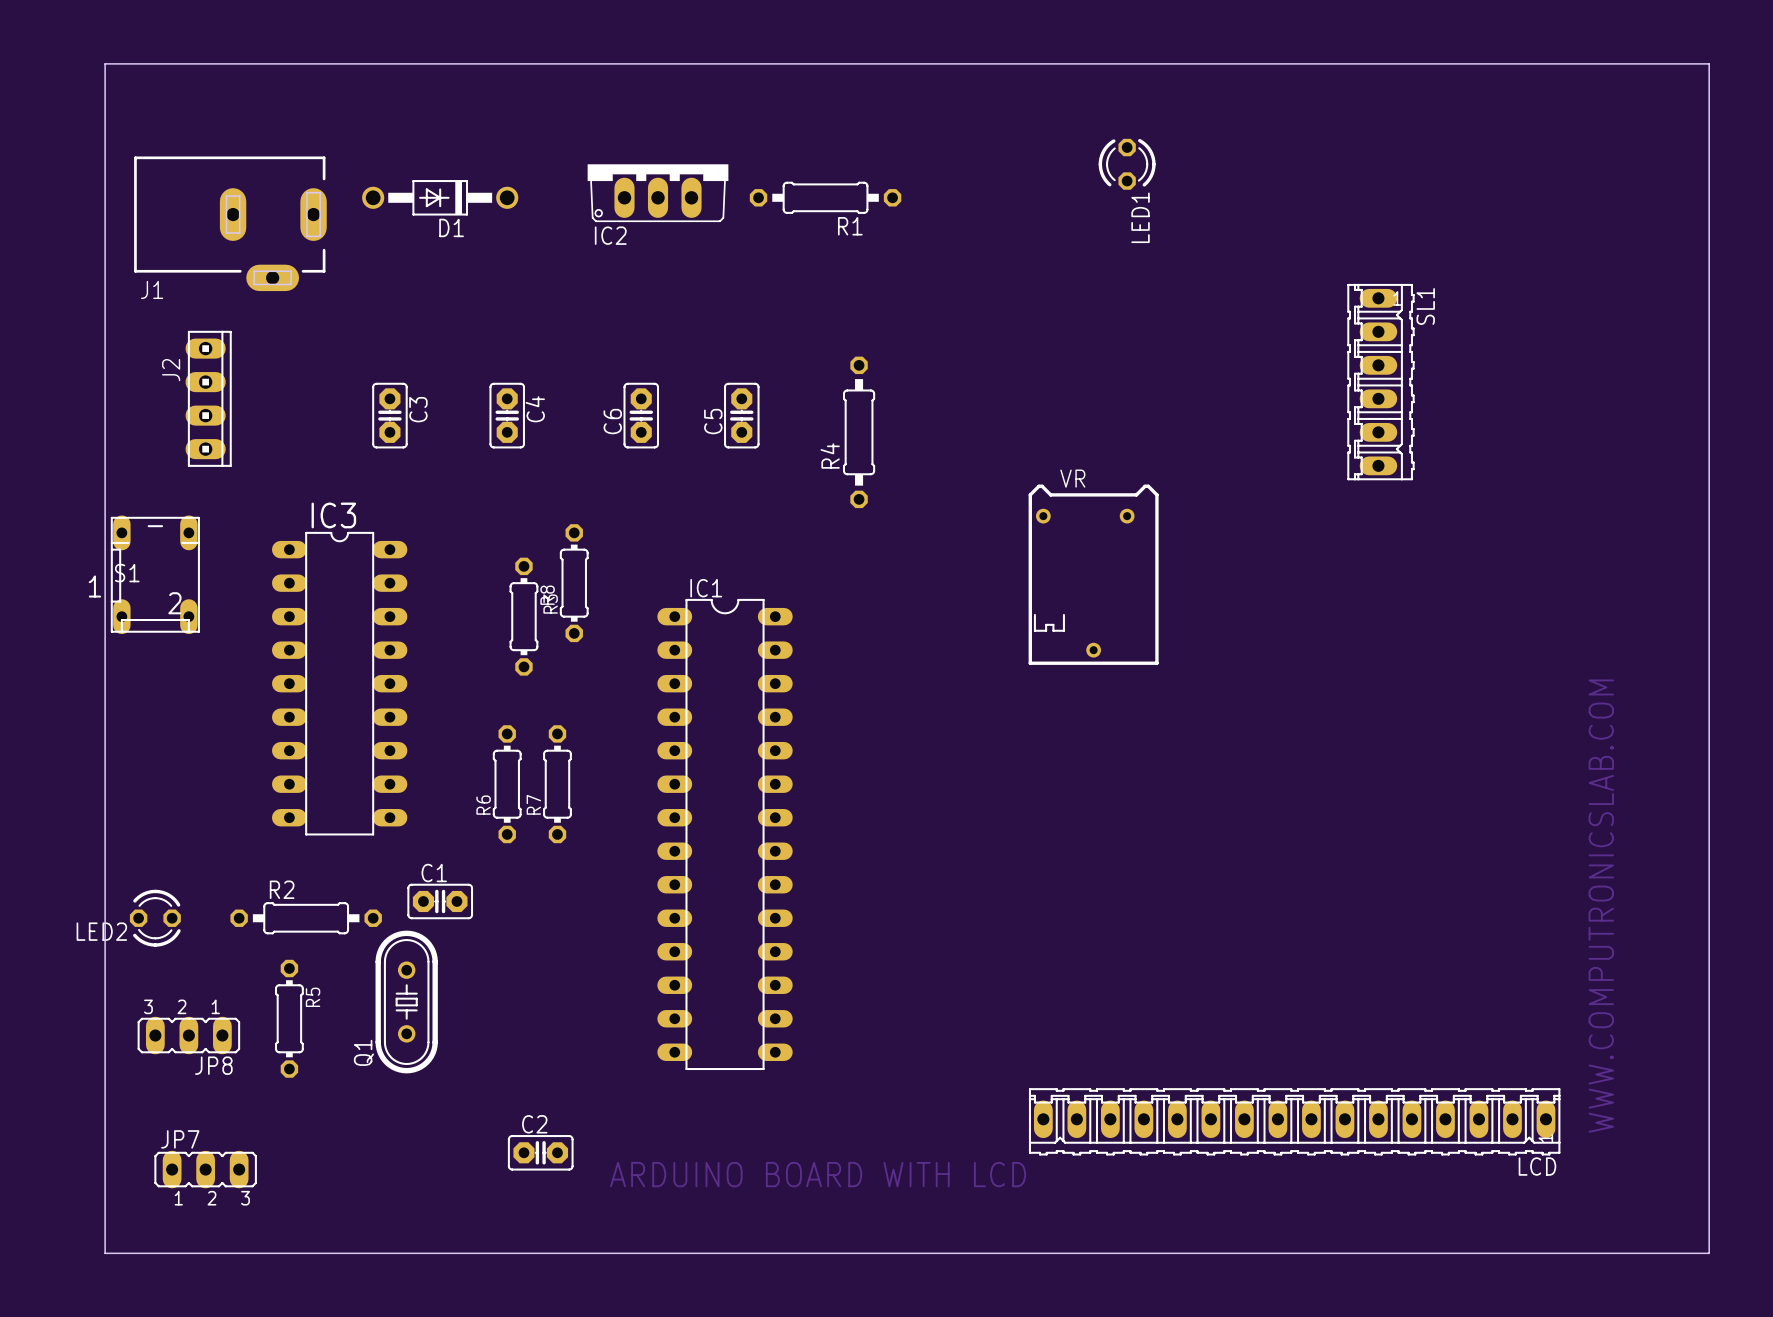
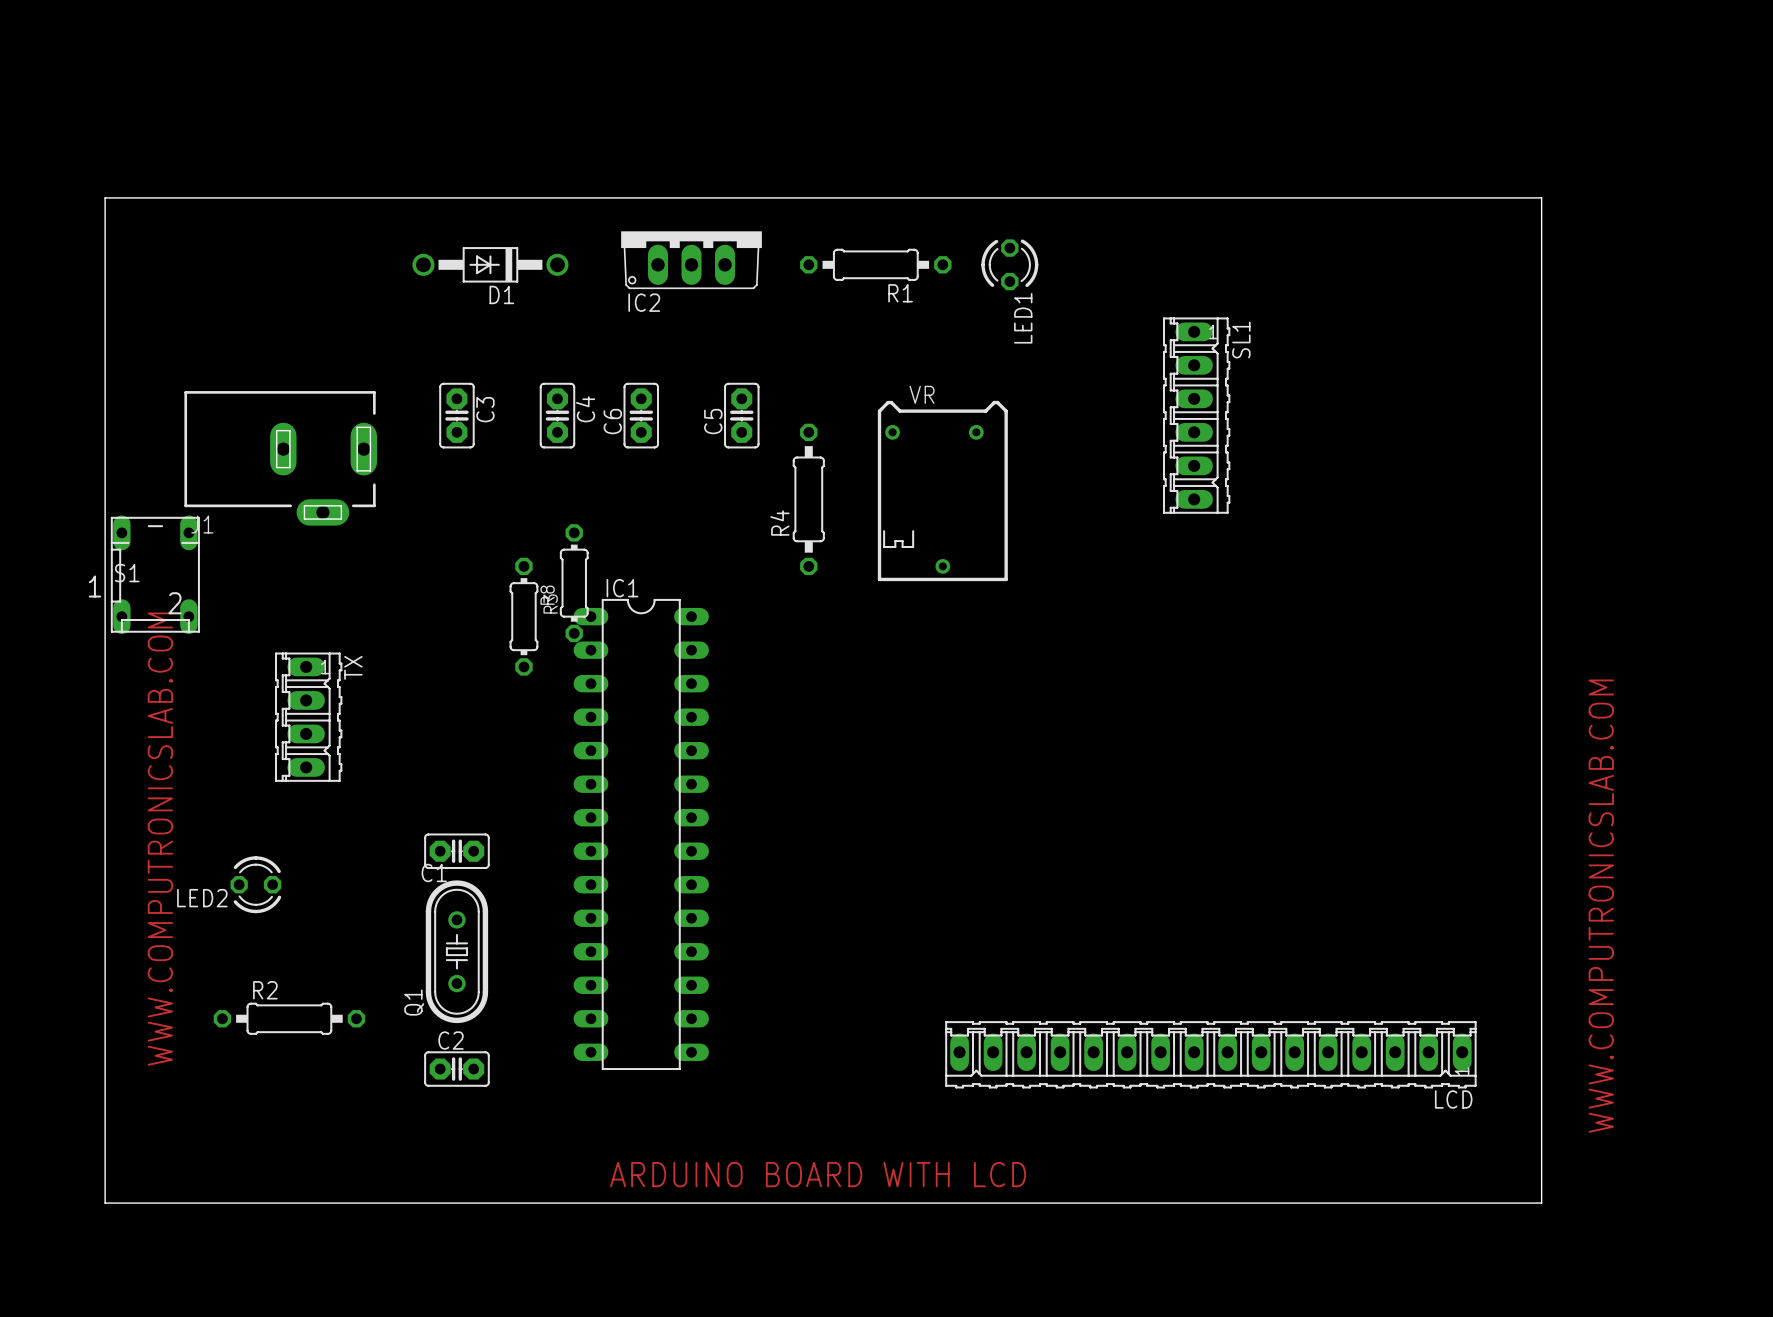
LED1 position: (1127, 164) -> (1009, 264)
IC2 position: (658, 193) -> (691, 260)
board edge: (105, 197) (105, 63) (1709, 63) (1709, 1253) (105, 1253) (105, 1203) -> (105, 197) (1541, 197) (1541, 1203) (105, 1203)
D1 position: (440, 197) -> (490, 264)
R1 position: (825, 197) -> (875, 264)
J1 position: (230, 223) -> (280, 458)
SL1 position: (1380, 382) -> (1196, 415)
J2: (208, 398) -> none
C3 position: (389, 415) -> (456, 415)
C4 position: (507, 415) -> (557, 415)
R4 position: (859, 432) -> (808, 499)
VR position: (1093, 574) -> (942, 491)
IC3: (339, 683) -> none
TX: none -> (308, 717)
R6: (507, 784) -> none
R7: (557, 784) -> none
IC1 position: (725, 834) -> (641, 834)
text: none -> WWW.COMPUTRONICSLAB.COM (160, 839)
C1 position: (440, 901) -> (456, 851)
LED2 position: (155, 918) -> (255, 884)
R2 position: (306, 918) -> (289, 1018)
Q1 position: (406, 1002) -> (456, 951)
R5: (289, 1018) -> none
JP8: (188, 1035) -> none
LCD position: (1294, 1121) -> (1210, 1054)
C2 position: (540, 1152) -> (456, 1069)
JP7: (205, 1169) -> none

